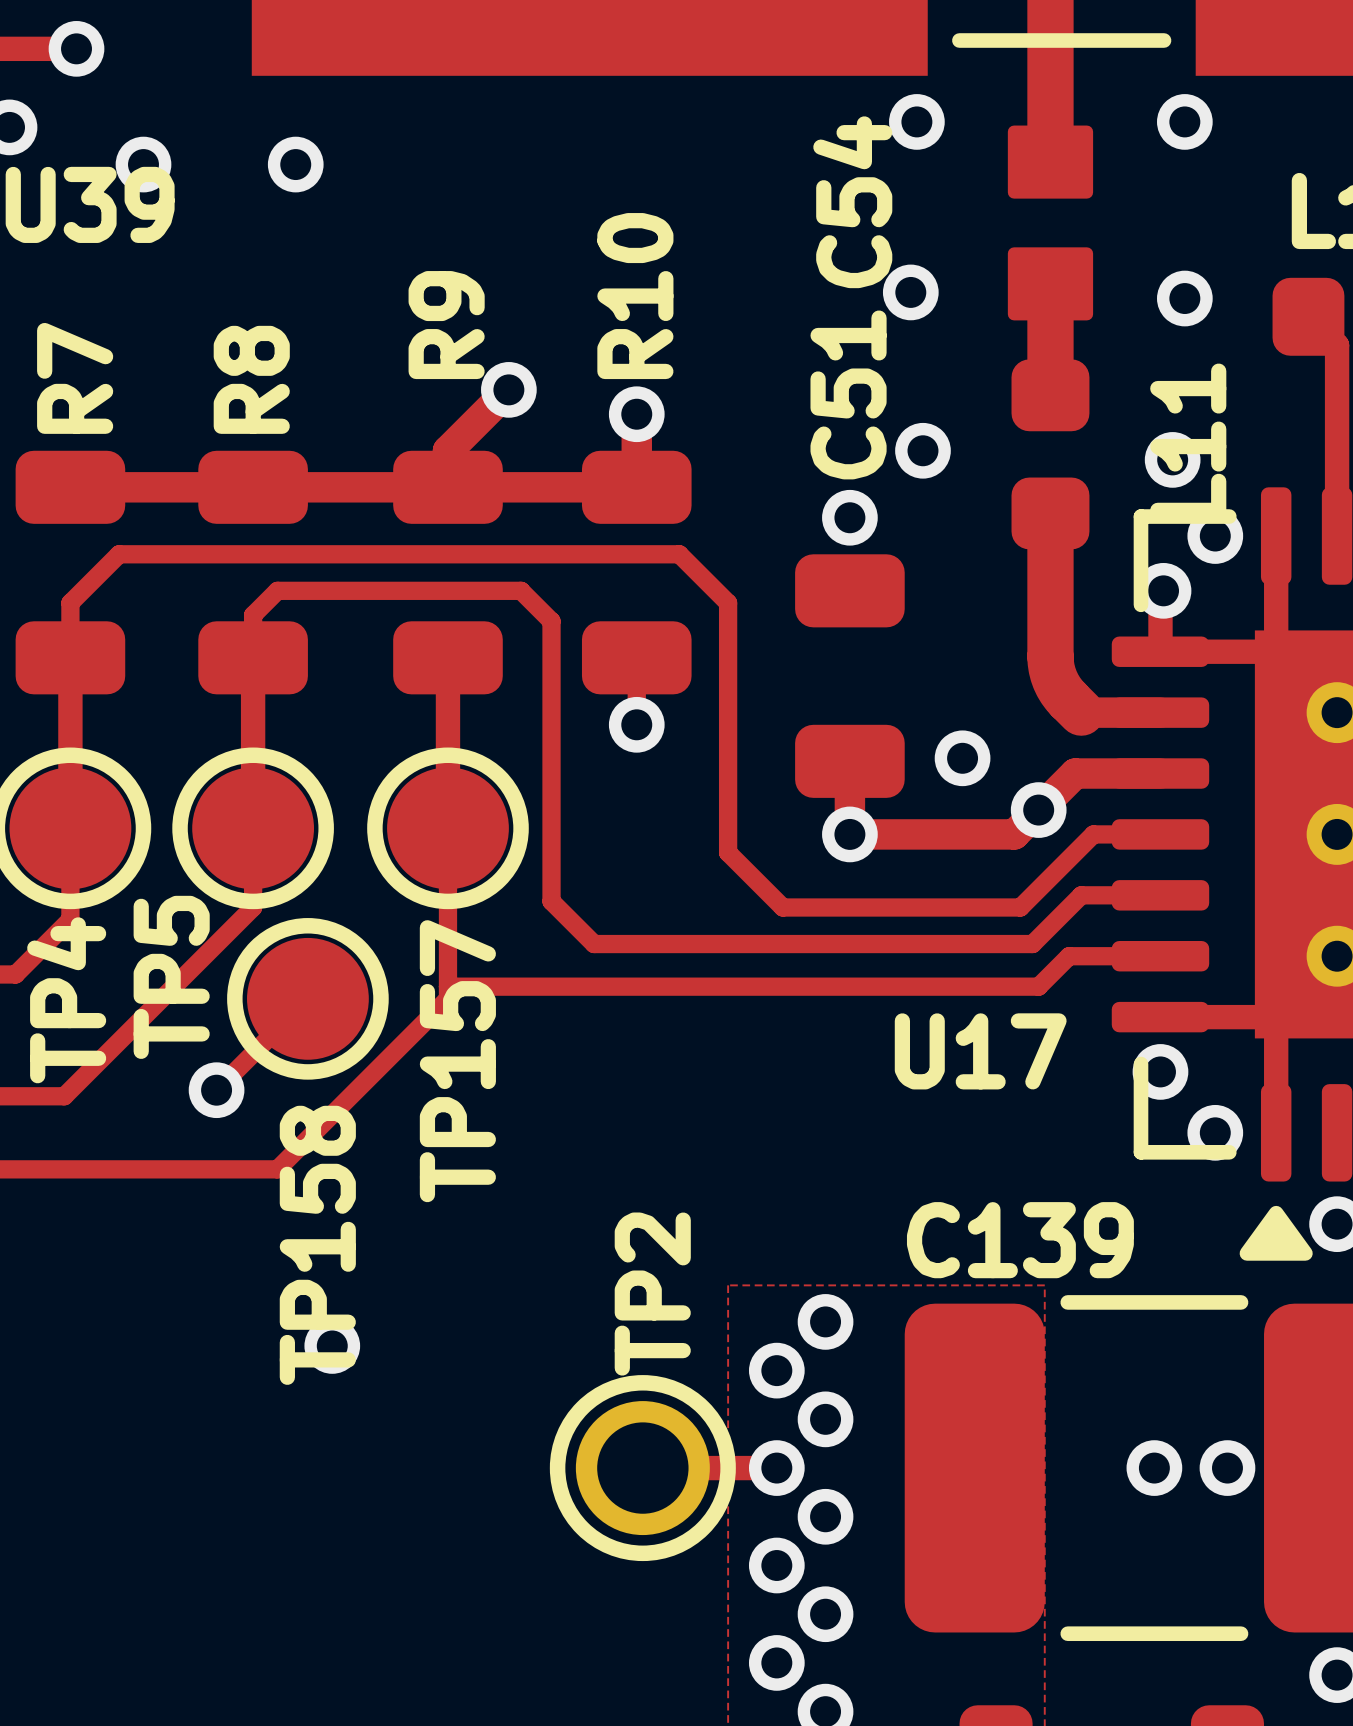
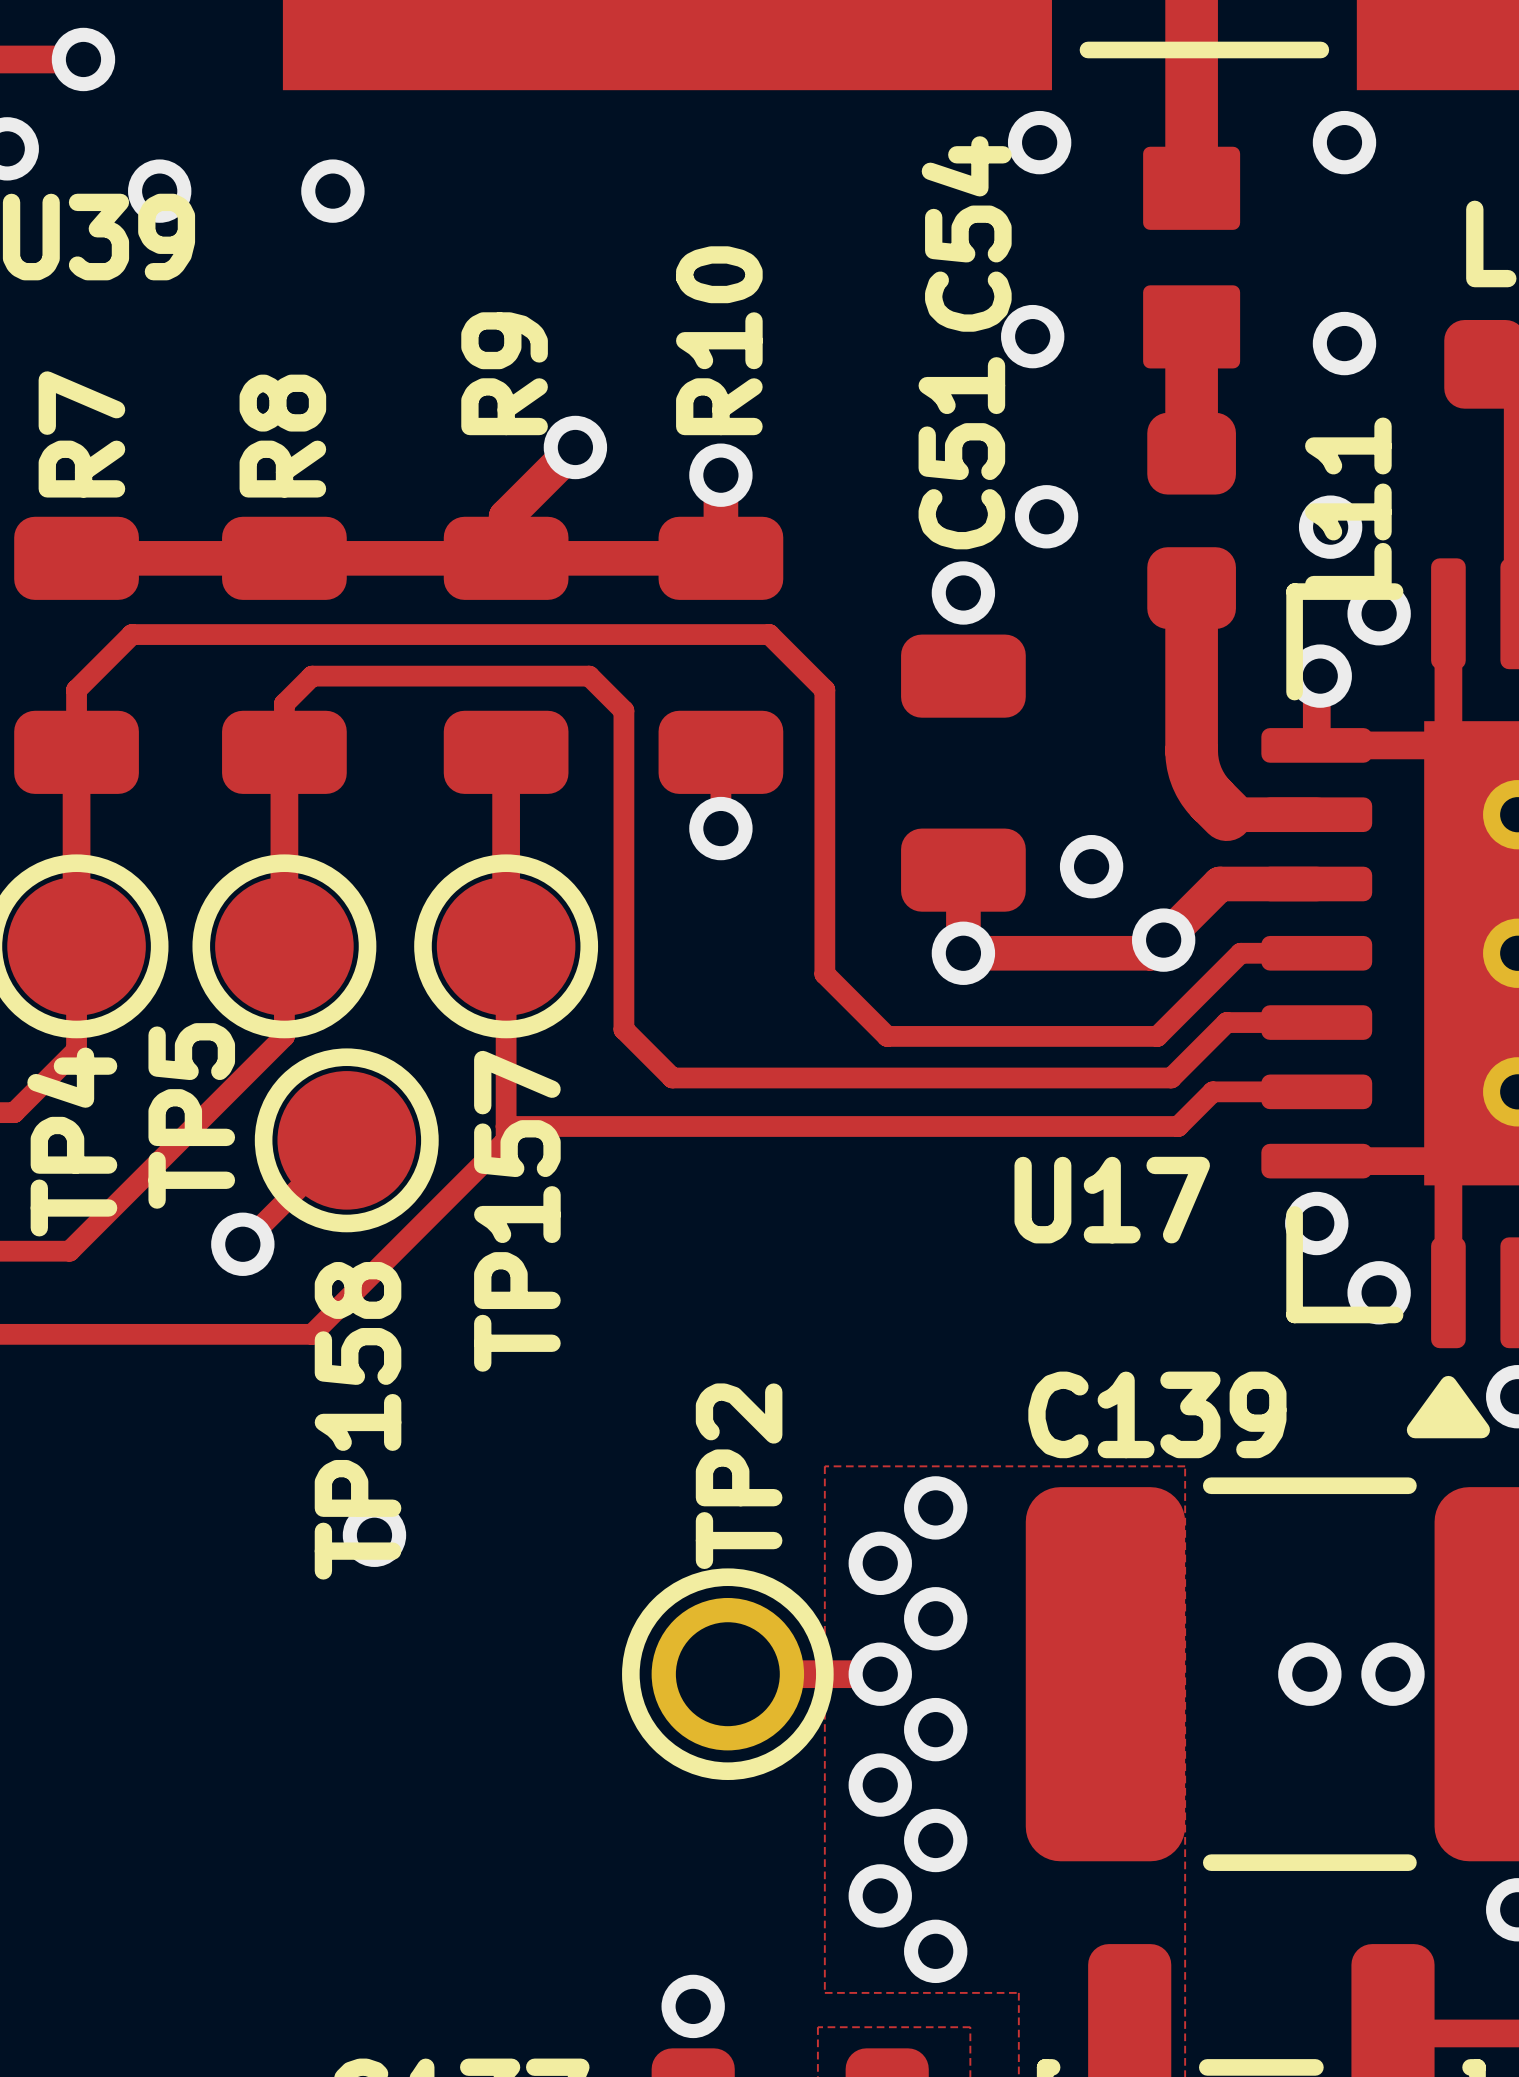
via position: (1038, 810) -> (1163, 940)

